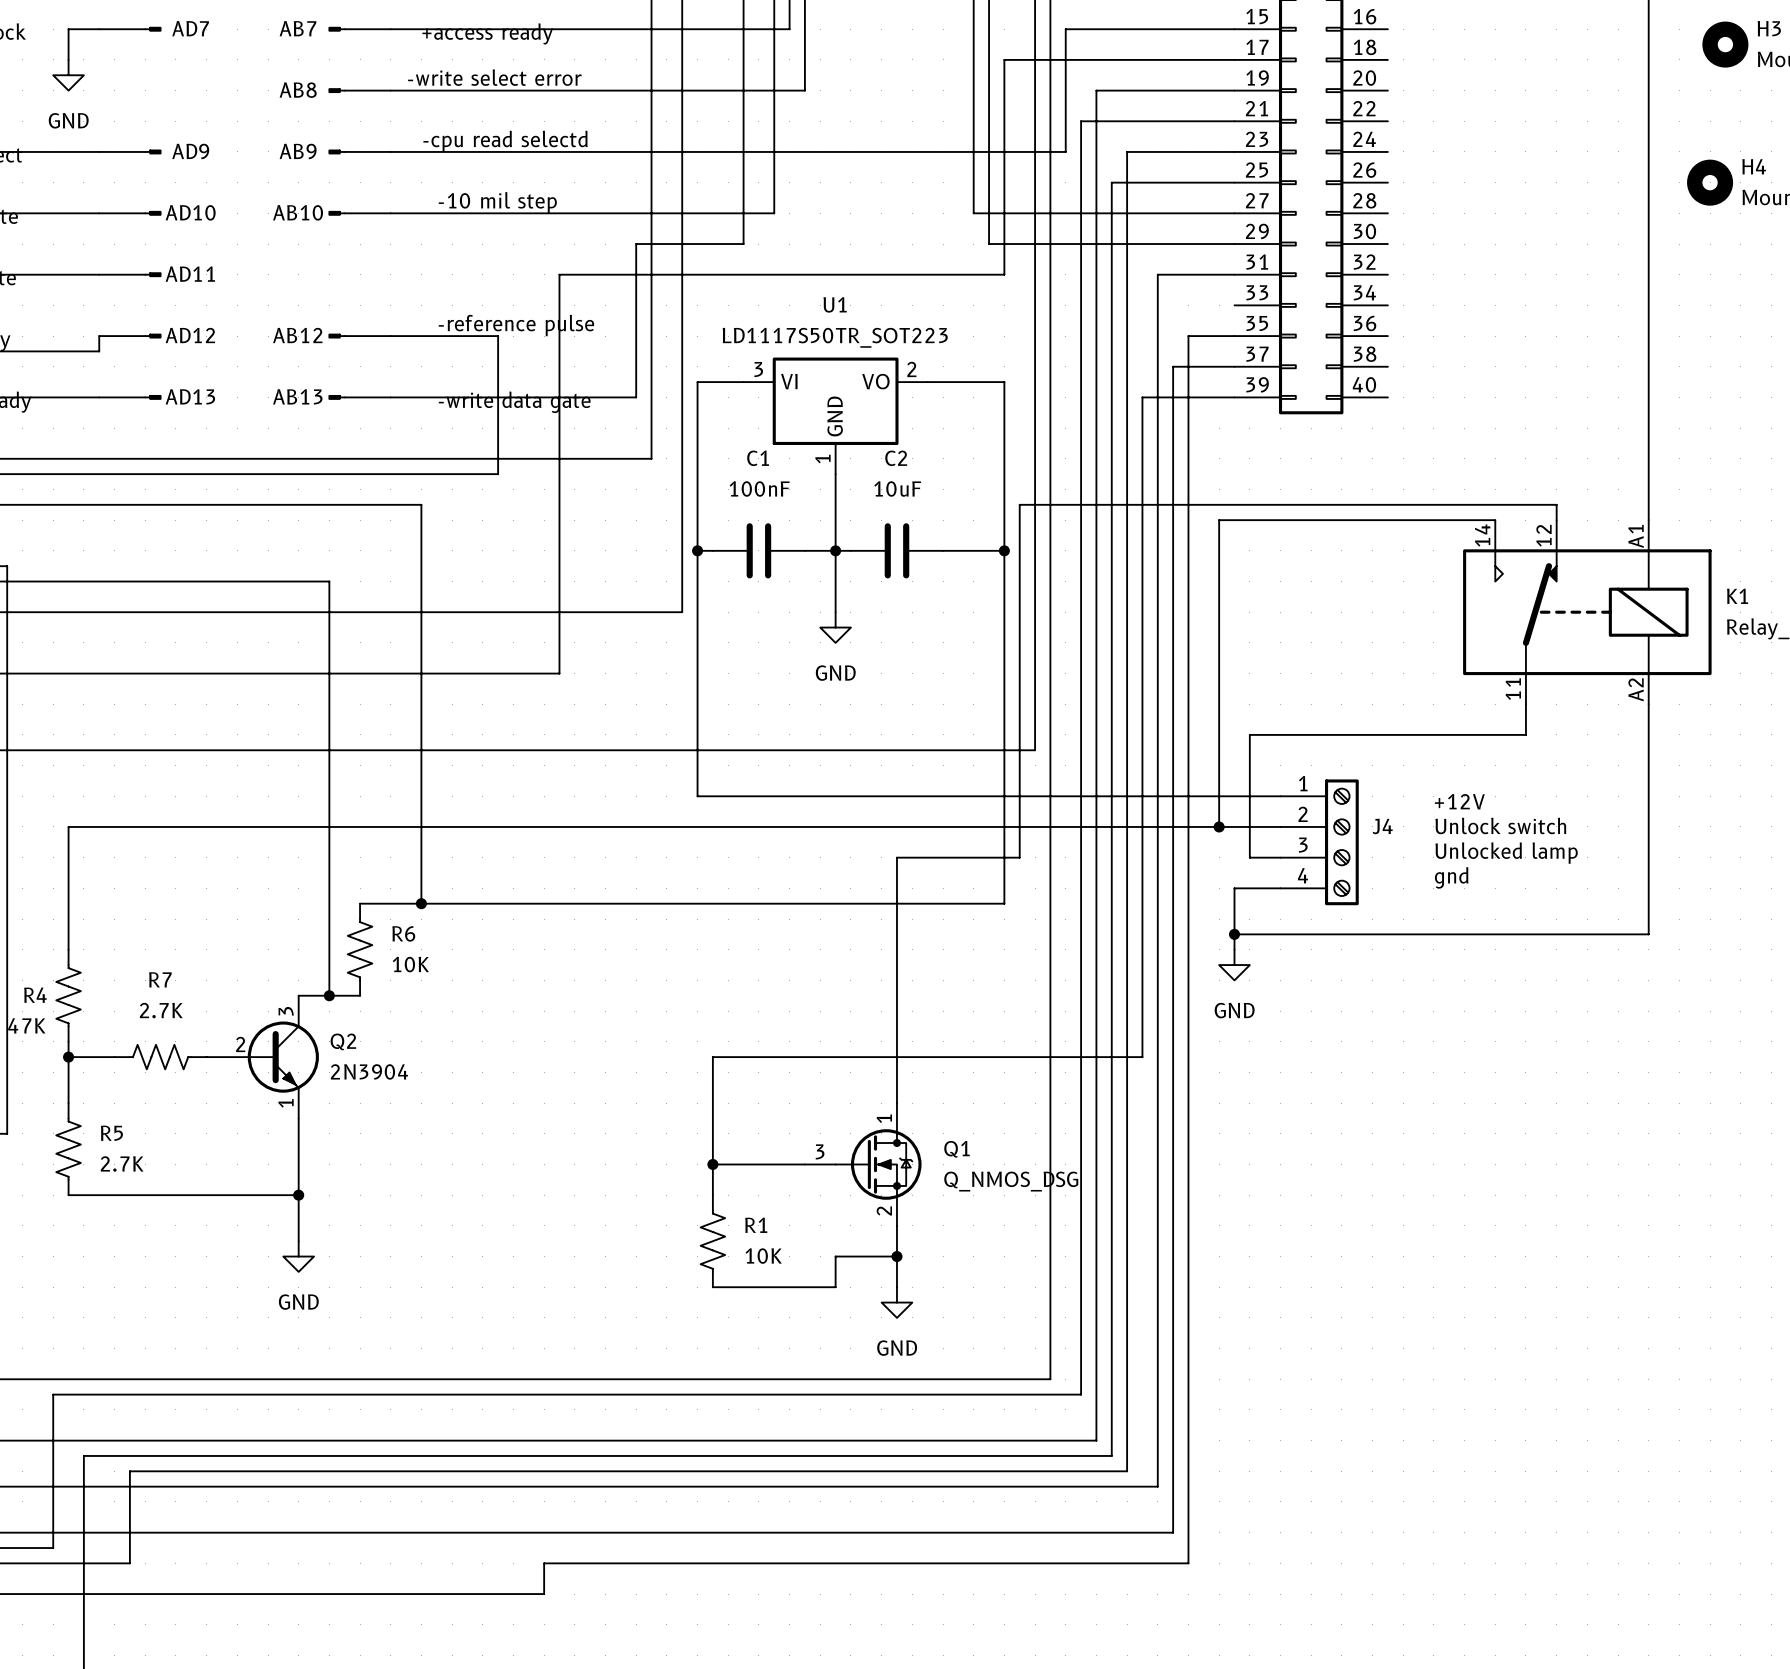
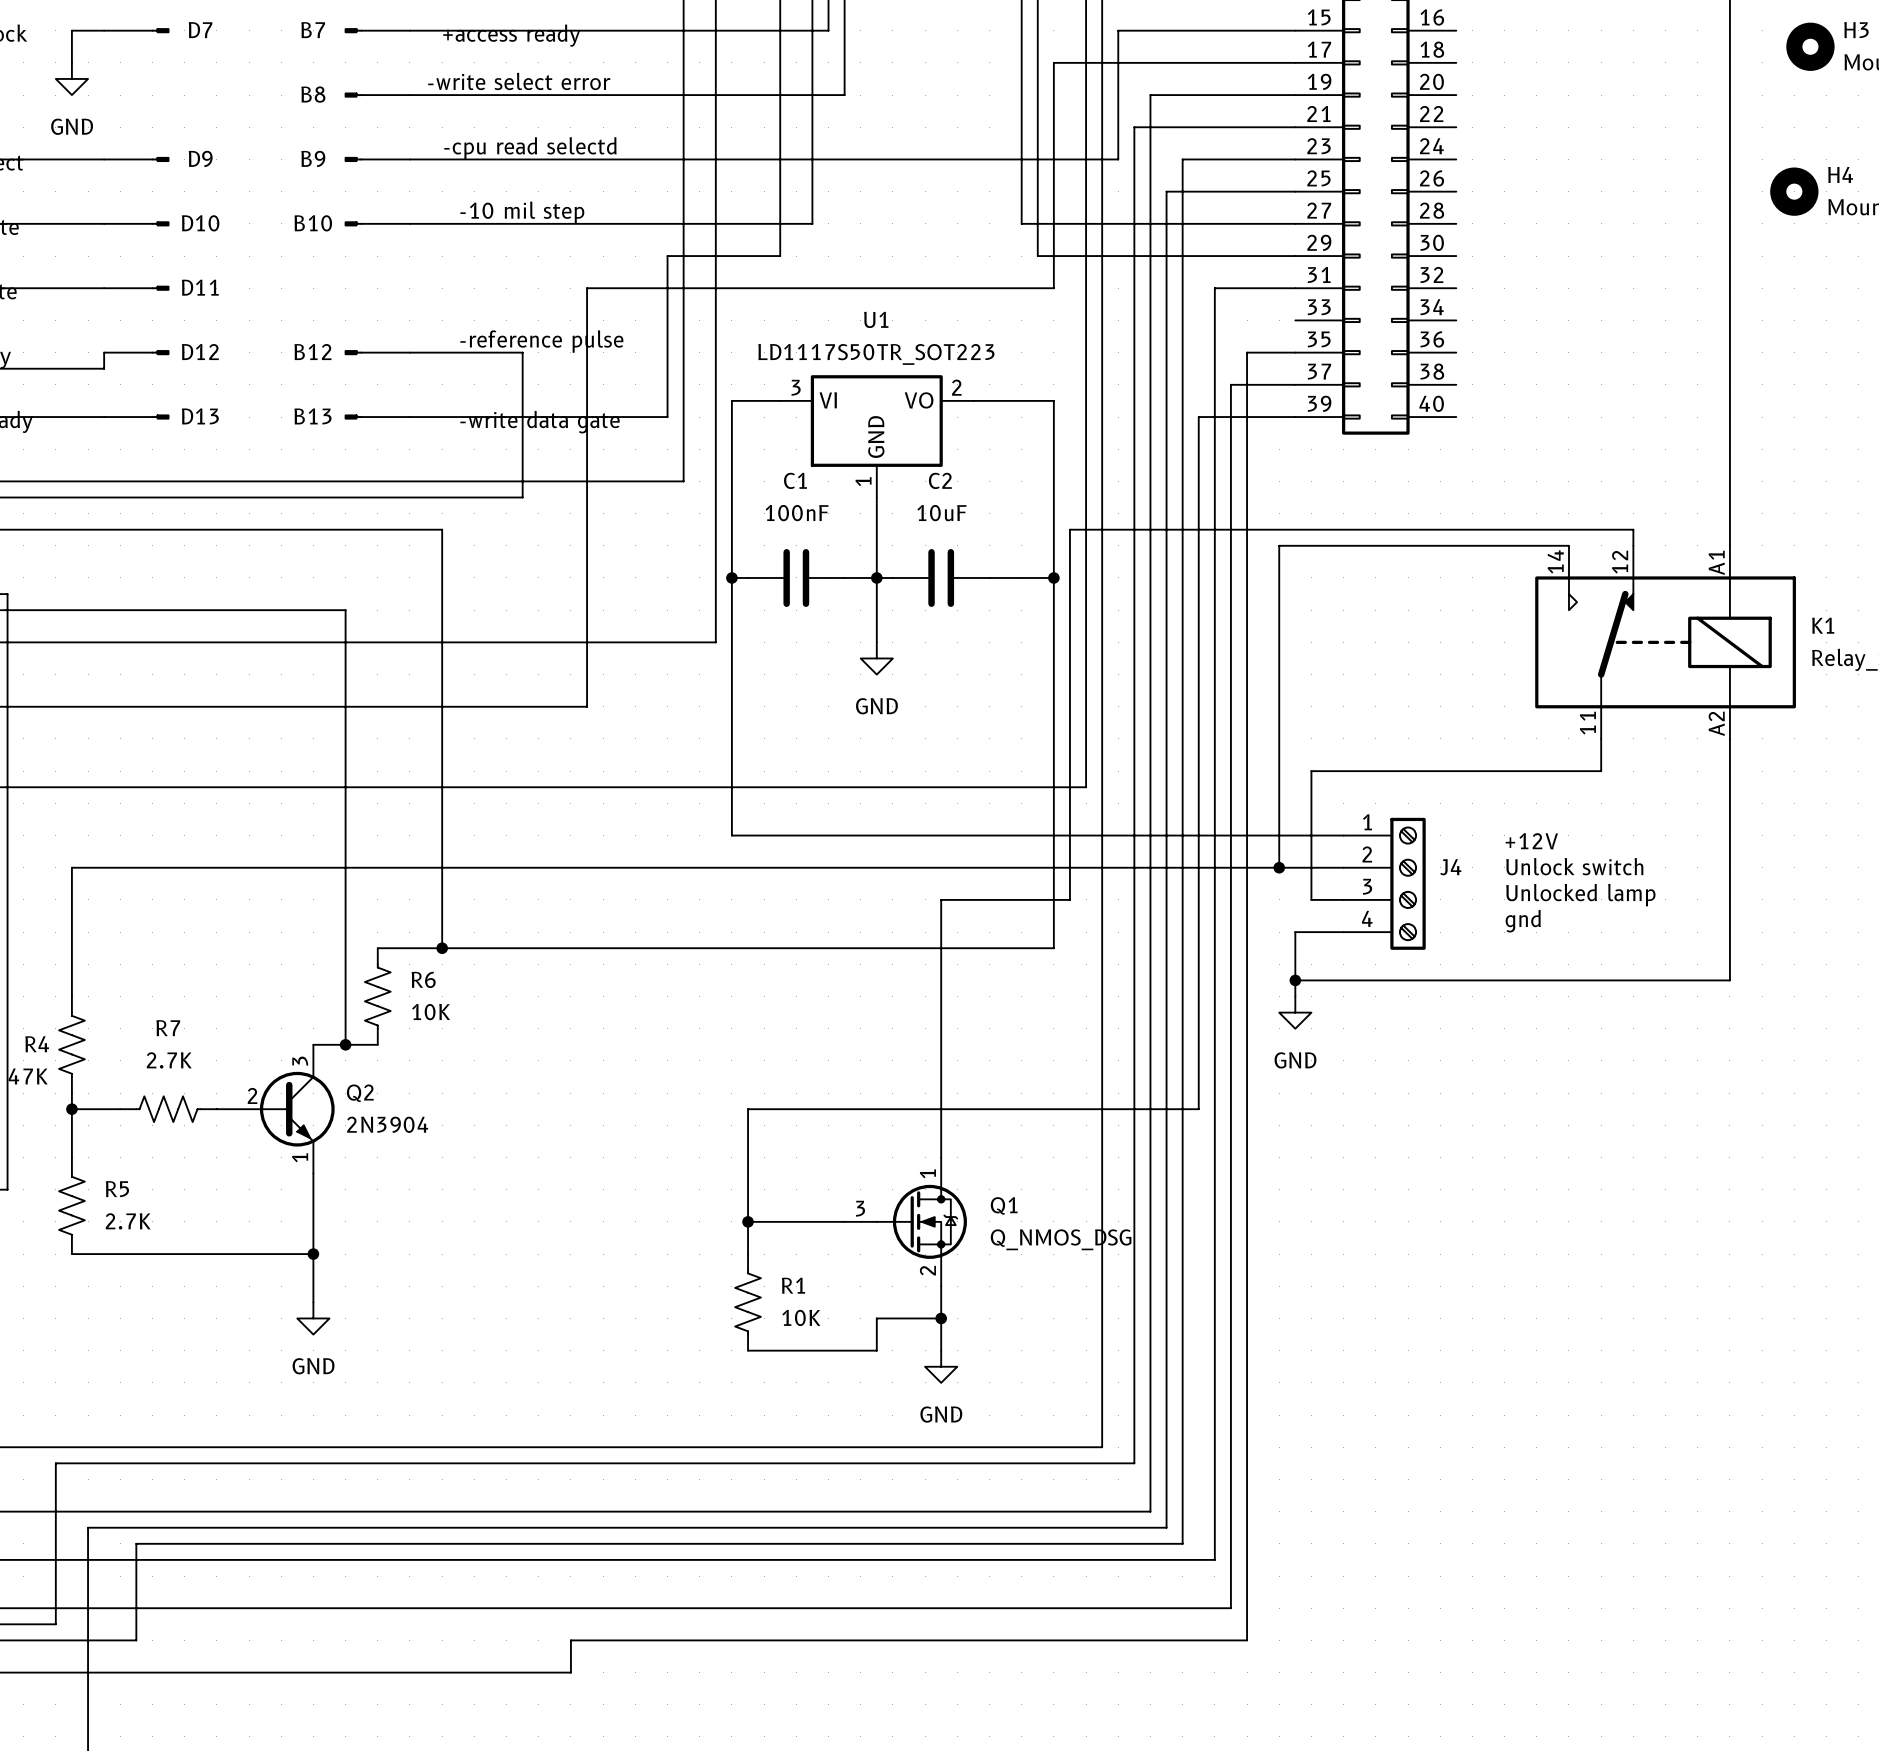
AD7 name: AD7 (190, 28) -> D7 (200, 30)
AB7 name: AB7 (297, 28) -> B7 (313, 30)
AB8 name: AB8 (298, 90) -> B8 (313, 94)
AD9 name: AD9 (190, 151) -> D9 (200, 158)
AB9 name: AB9 (298, 151) -> B9 (313, 158)
AD10 name: AD10 (190, 212) -> D10 (200, 223)
AB10 name: AB10 (298, 212) -> B10 (313, 223)
AD11 name: AD11 (190, 274) -> D11 (200, 287)
AD12 name: AD12 (190, 335) -> D12 (200, 352)
AB12 name: AB12 (297, 335) -> B12 (312, 352)
AD13 name: AD13 (190, 396) -> D13 (200, 416)
AB13 name: AB13 (297, 396) -> B13 (312, 416)

